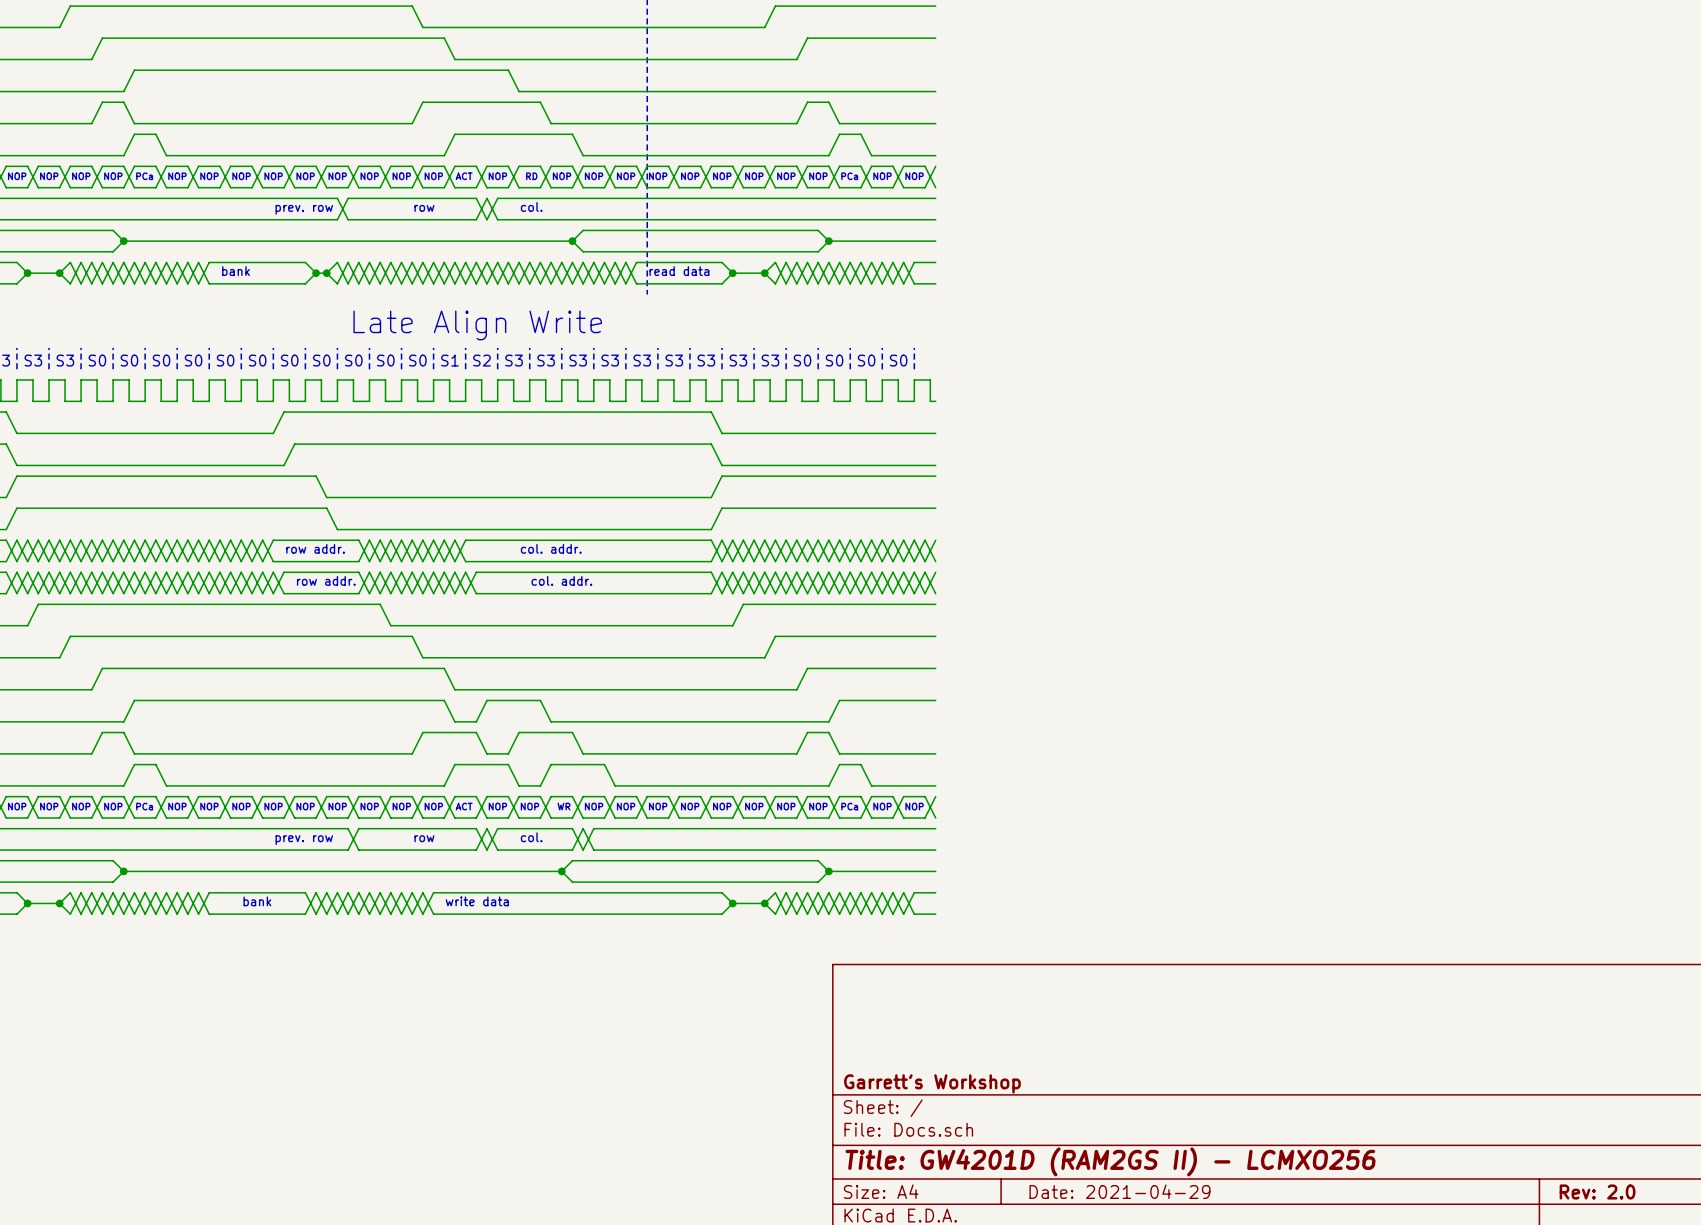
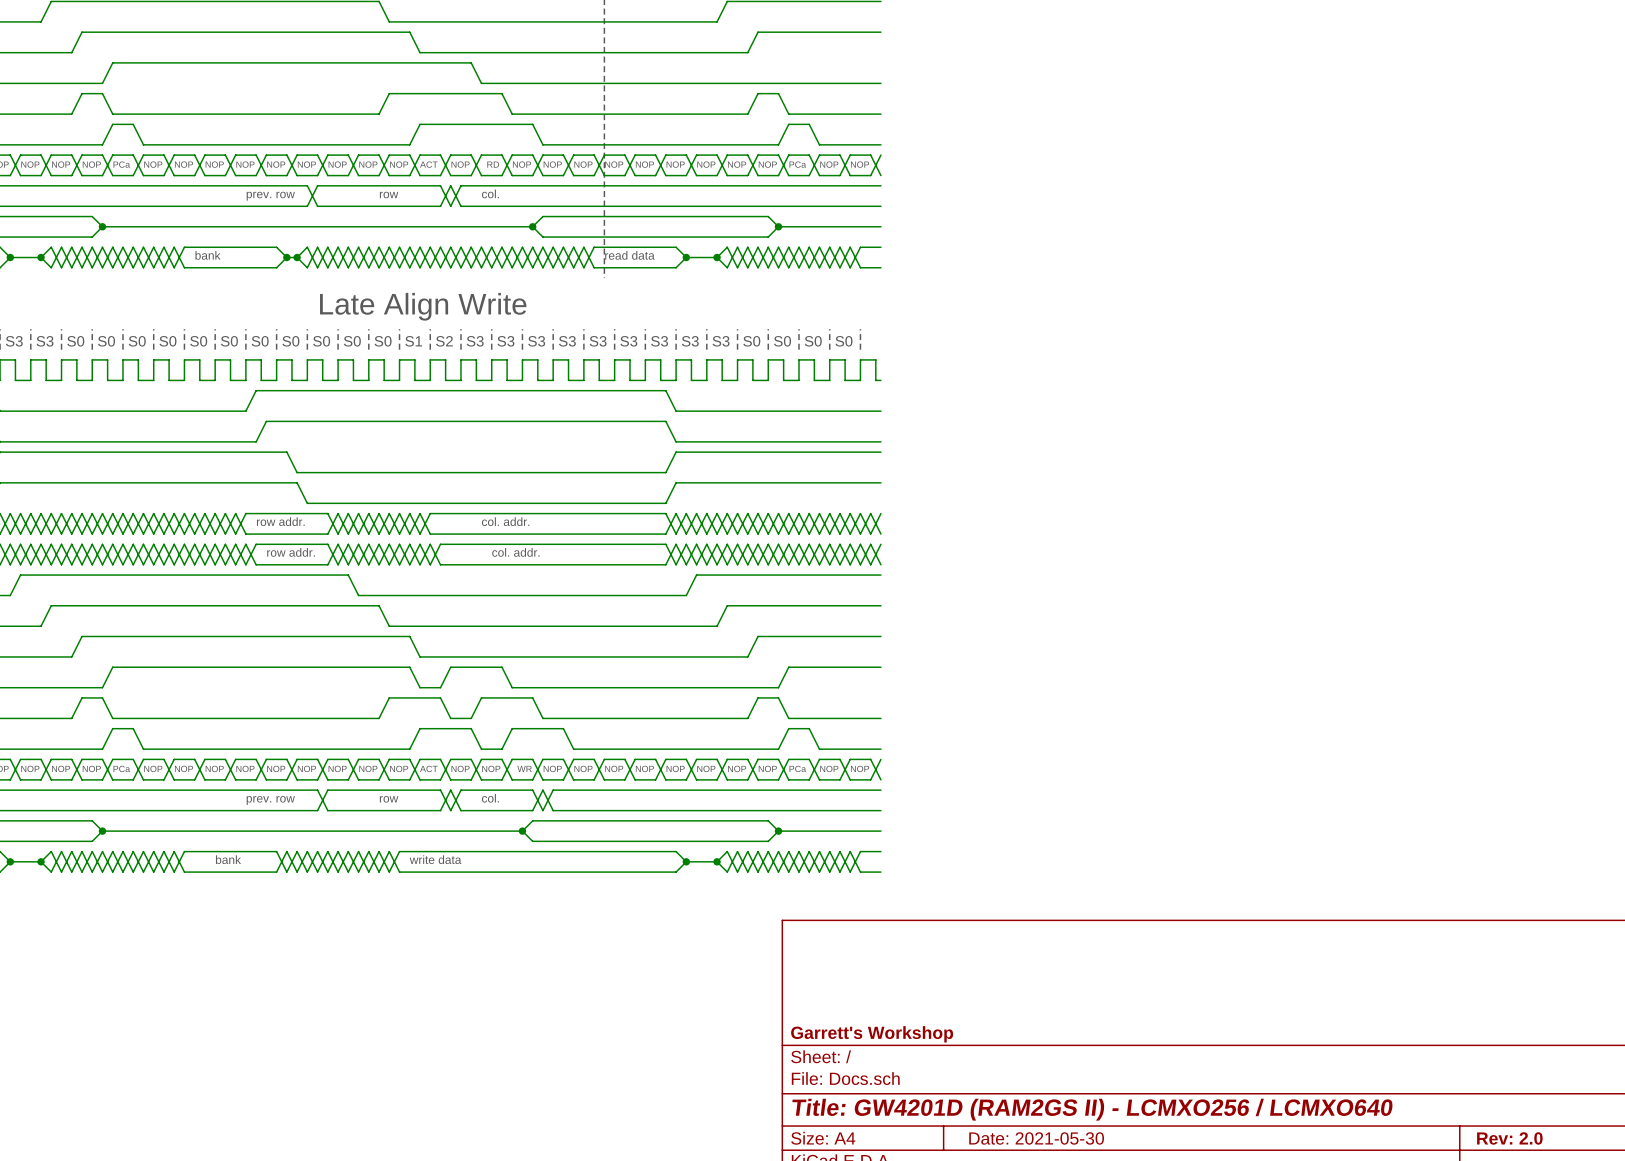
title block: Title: GW4201D (RAM2GS II) - LCMXO256 (1110, 1161) -> Title: GW4201D (RAM2GS II) - LCMXO256 / LCMXO640 (1092, 1109)
title block: Date: 2021-04-29 (1119, 1191) -> Date: 2021-05-30 (1036, 1138)

